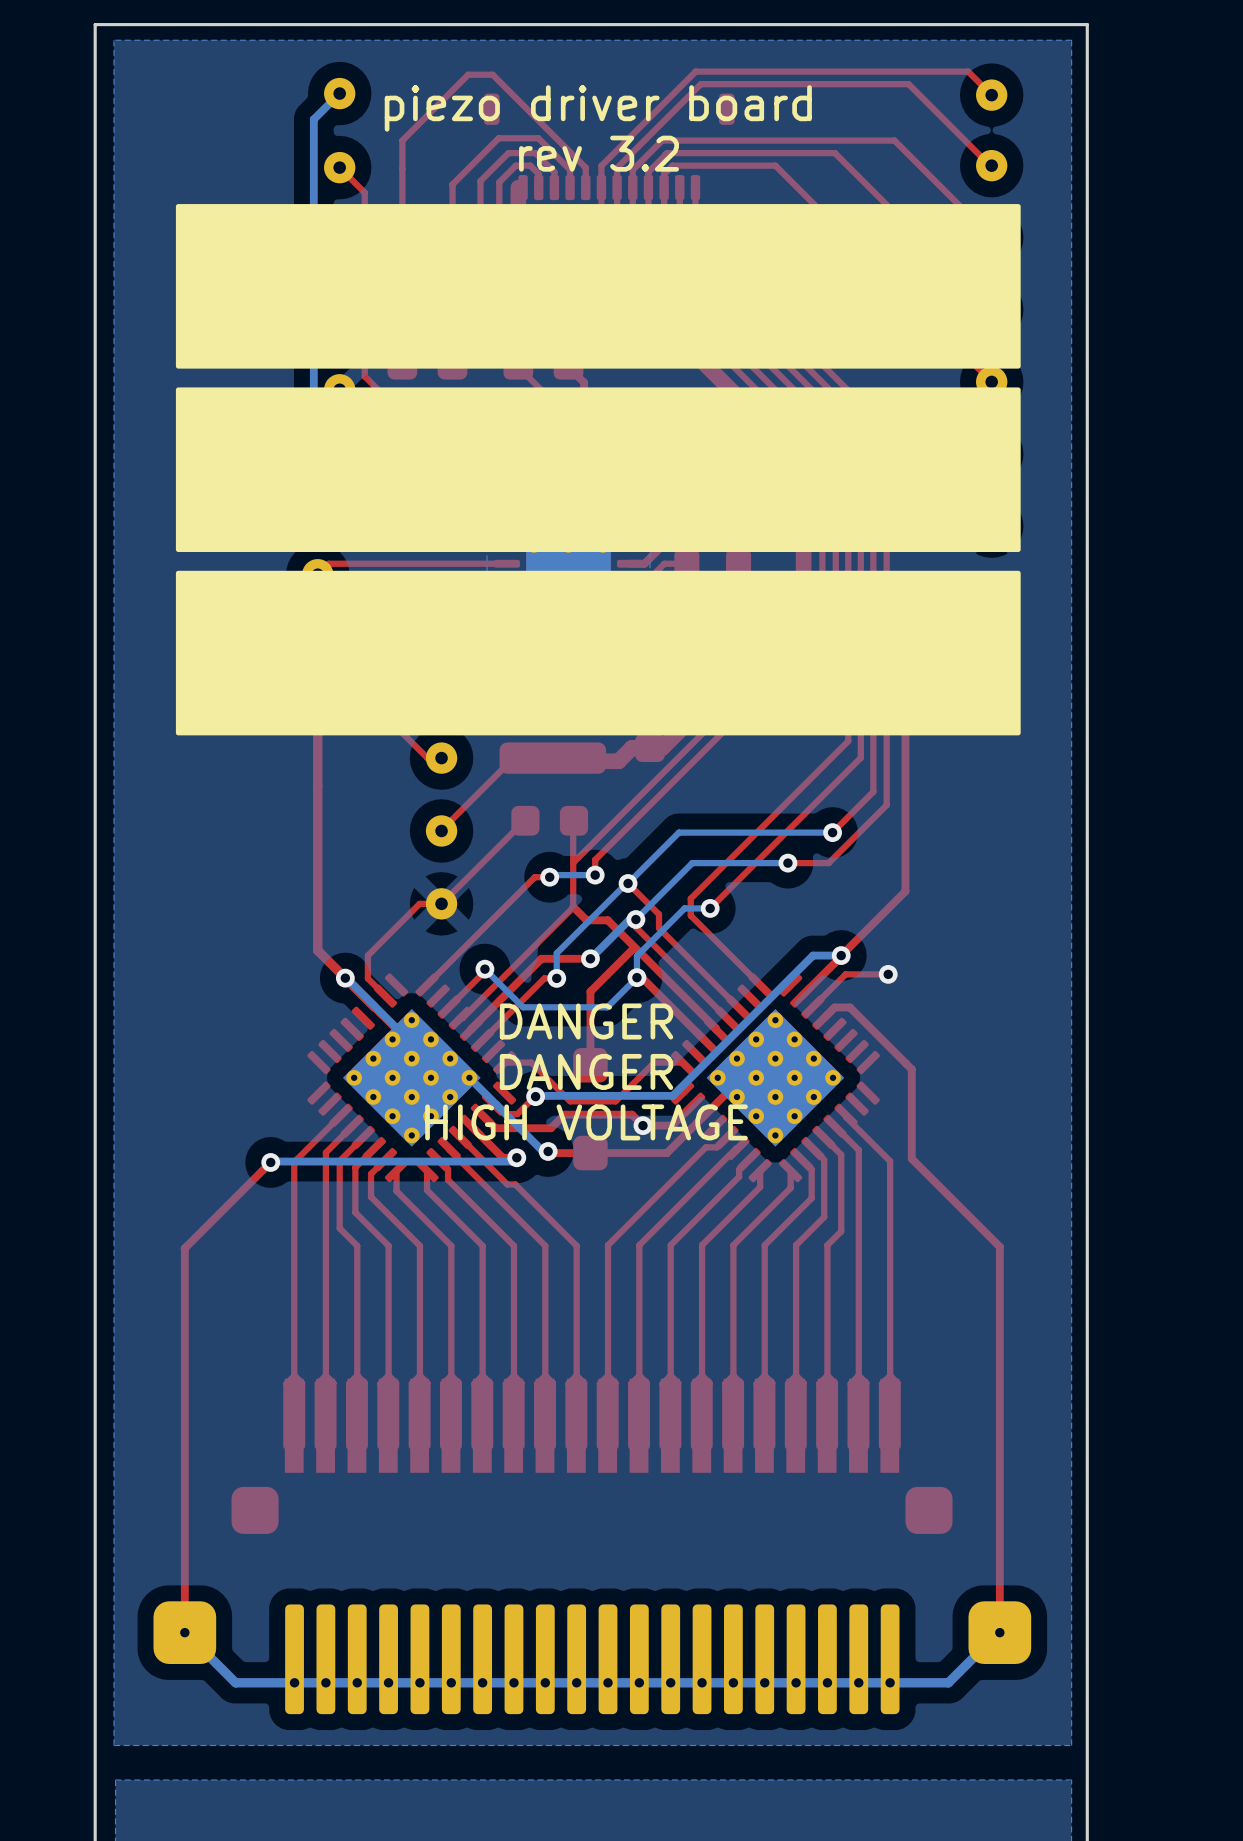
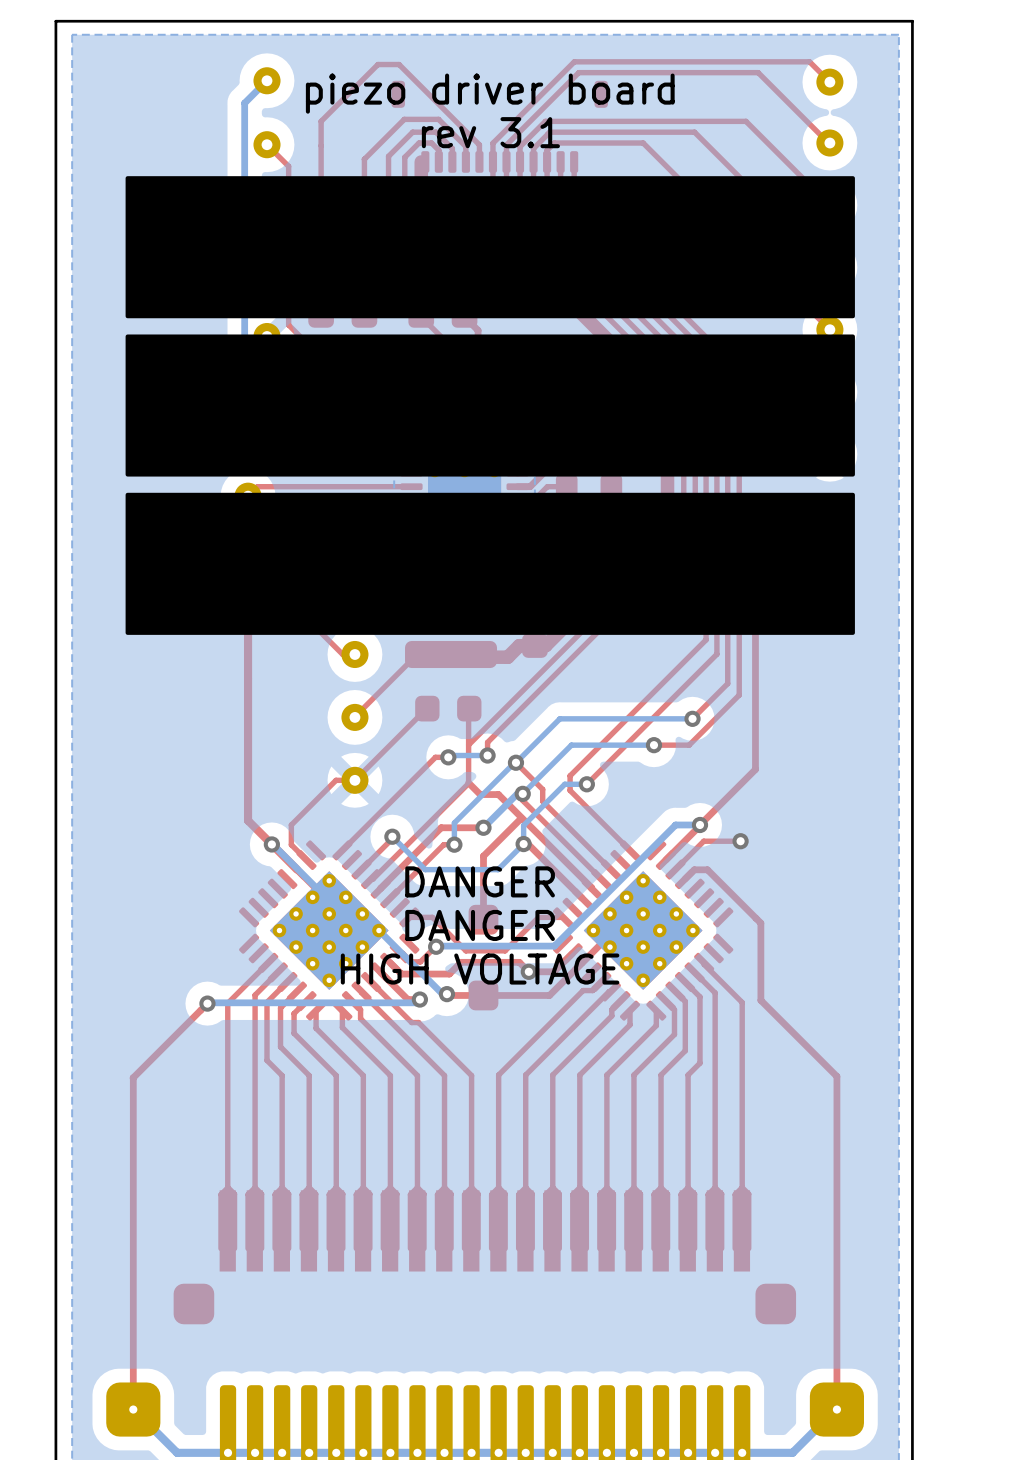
text: rev 3.2 (599, 153) -> rev 3.1 (490, 132)

